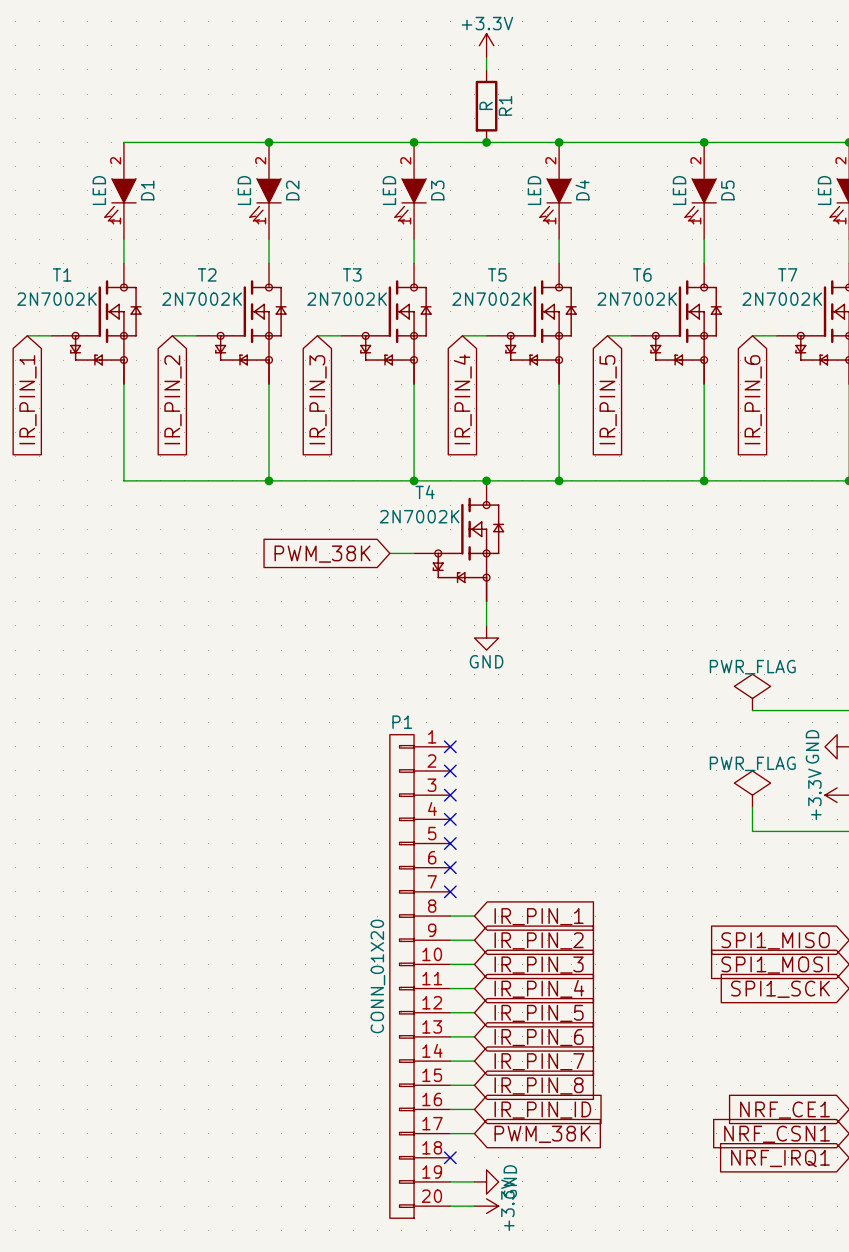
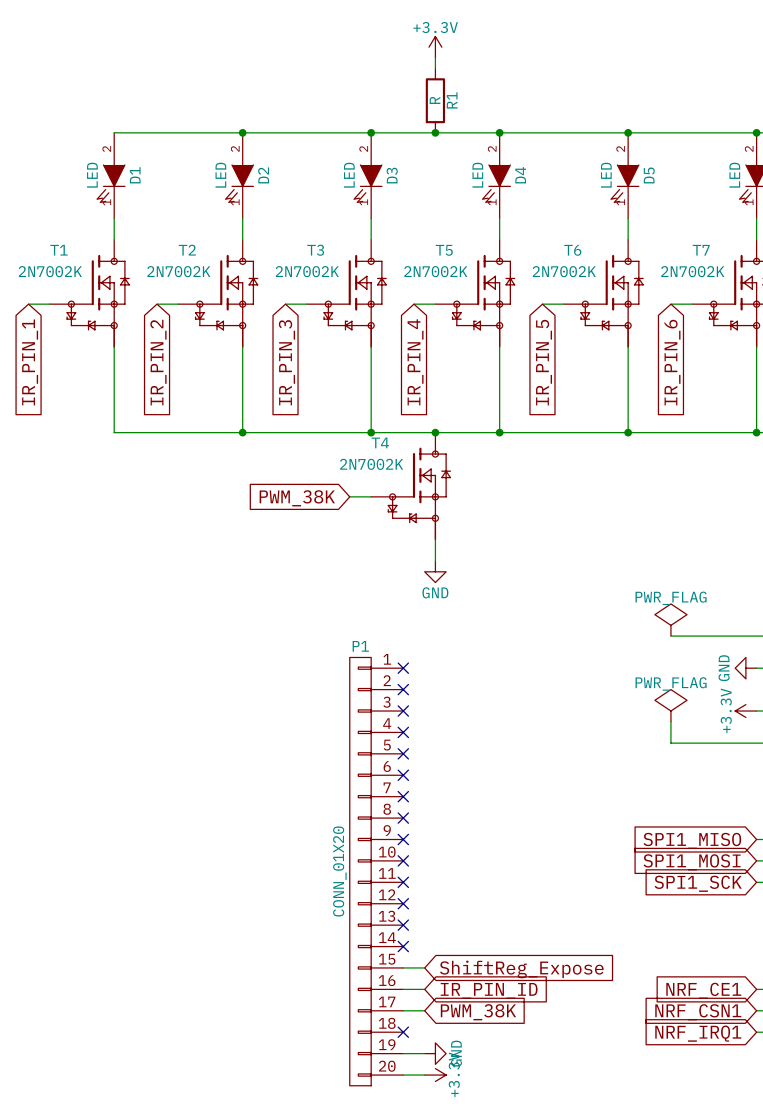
wire: (450, 916) (474, 916) -> none
no-connect mark: none -> (403, 818)
global label: IR_PIN_1 (539, 916) -> none
wire: (450, 940) (474, 940) -> none
no-connect mark: none -> (403, 839)
global label: IR_PIN_2 (539, 940) -> none
wire: (450, 964) (474, 964) -> none
no-connect mark: none -> (403, 860)
global label: IR_PIN_3 (539, 965) -> none
wire: (450, 988) (474, 988) -> none
no-connect mark: none -> (403, 882)
global label: IR_PIN_4 (539, 988) -> none
wire: (450, 1012) (474, 1012) -> none
no-connect mark: none -> (403, 903)
global label: IR_PIN_5 (539, 1013) -> none
wire: (450, 1036) (474, 1036) -> none
no-connect mark: none -> (403, 925)
global label: IR_PIN_6 (539, 1037) -> none
wire: (450, 1061) (474, 1061) -> none
no-connect mark: none -> (403, 946)
global label: IR_PIN_7 (539, 1061) -> none
global label: IR_PIN_8 (539, 1085) -> ShiftReg_Expose (521, 969)

